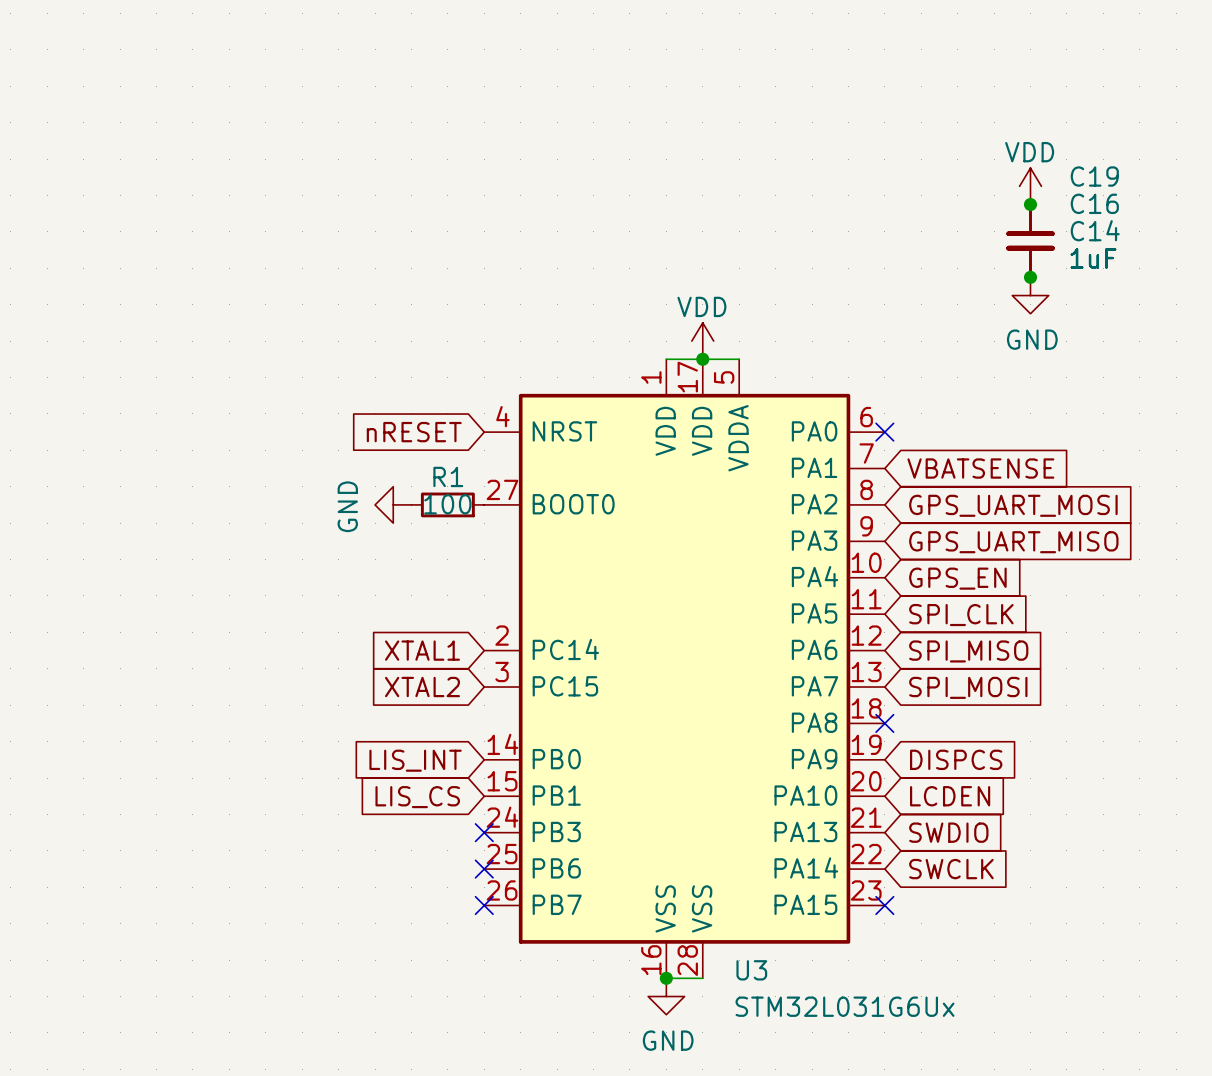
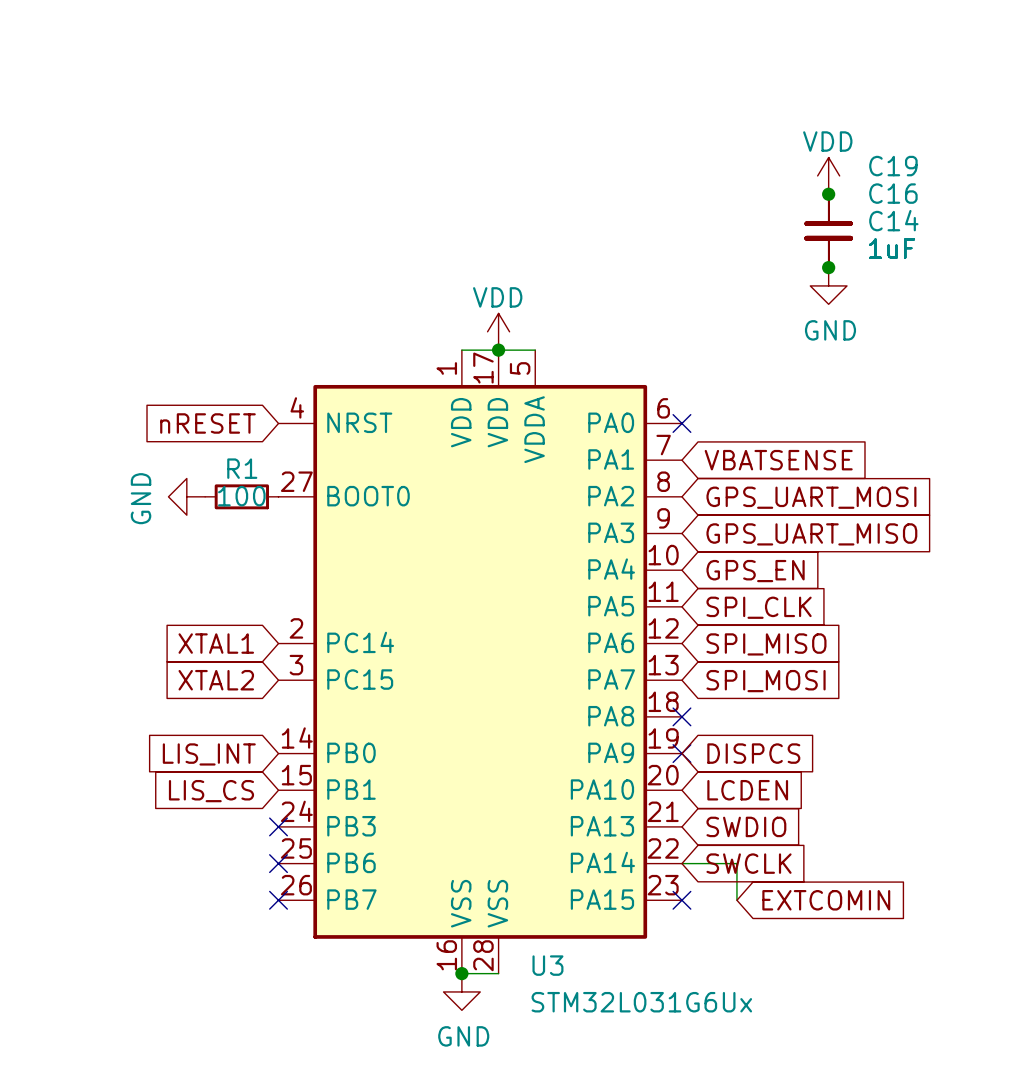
no-connect mark: none -> (681, 753)
wire: none -> (681, 863) (736, 863) (736, 900)
global label: none -> EXTCOMIN (826, 900)

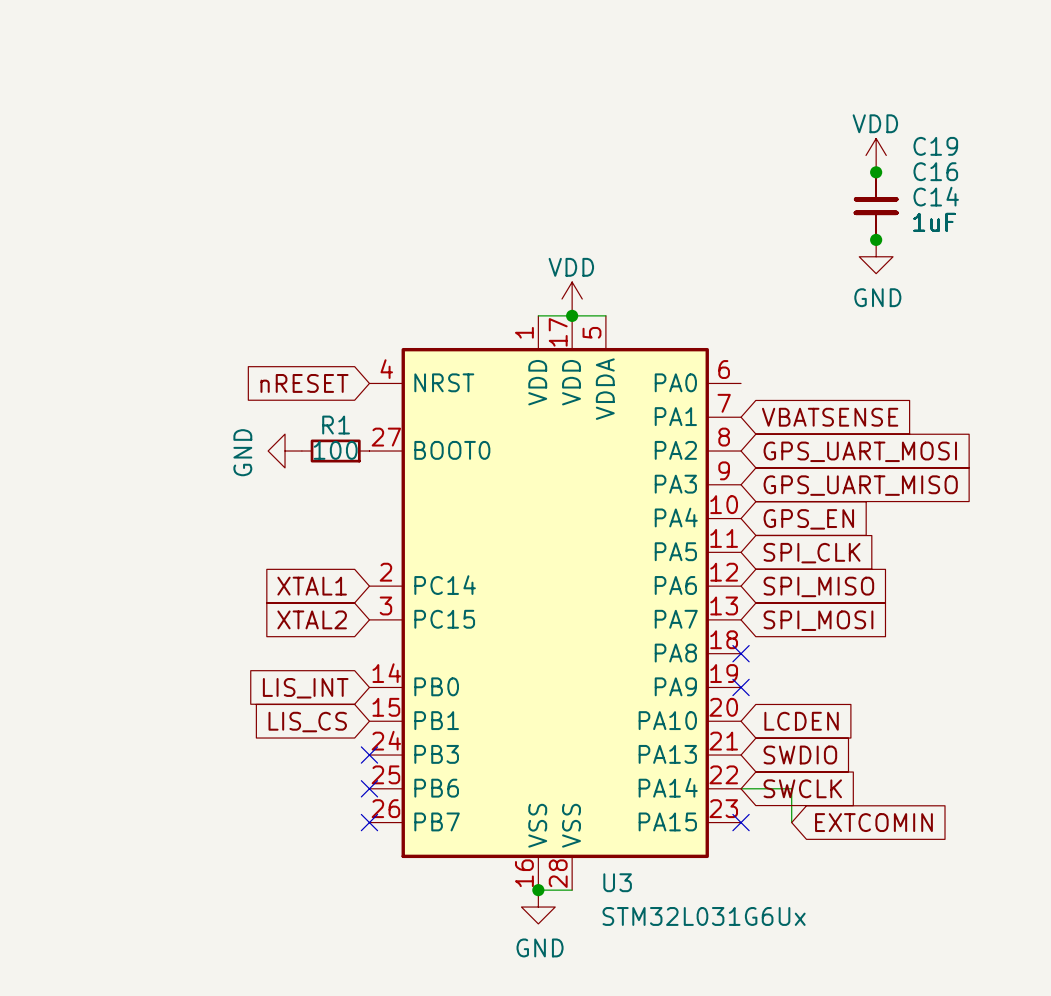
no-connect mark: (681, 423) -> none
global label: DISPCS (753, 753) -> none

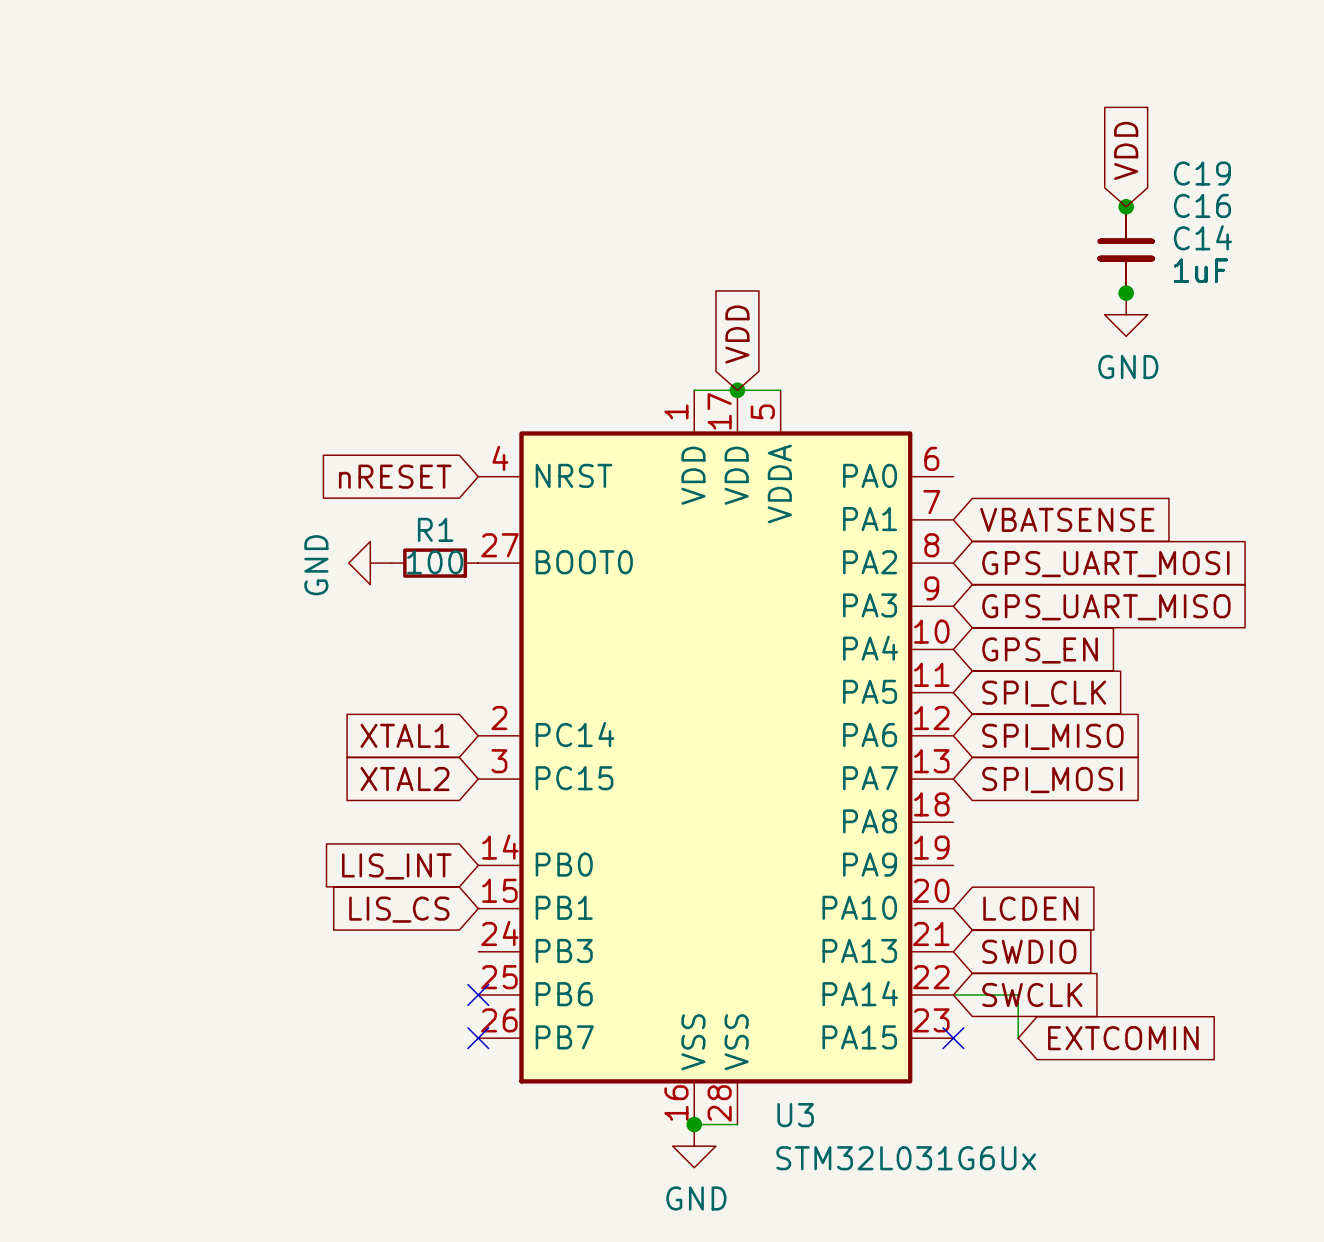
global label: none -> VDD (1126, 150)
power symbol: VDD (876, 155) -> none
global label: none -> VDD (737, 334)
power symbol: VDD (572, 299) -> none
no-connect mark: (741, 653) -> none
no-connect mark: (741, 687) -> none
no-connect mark: (369, 755) -> none

